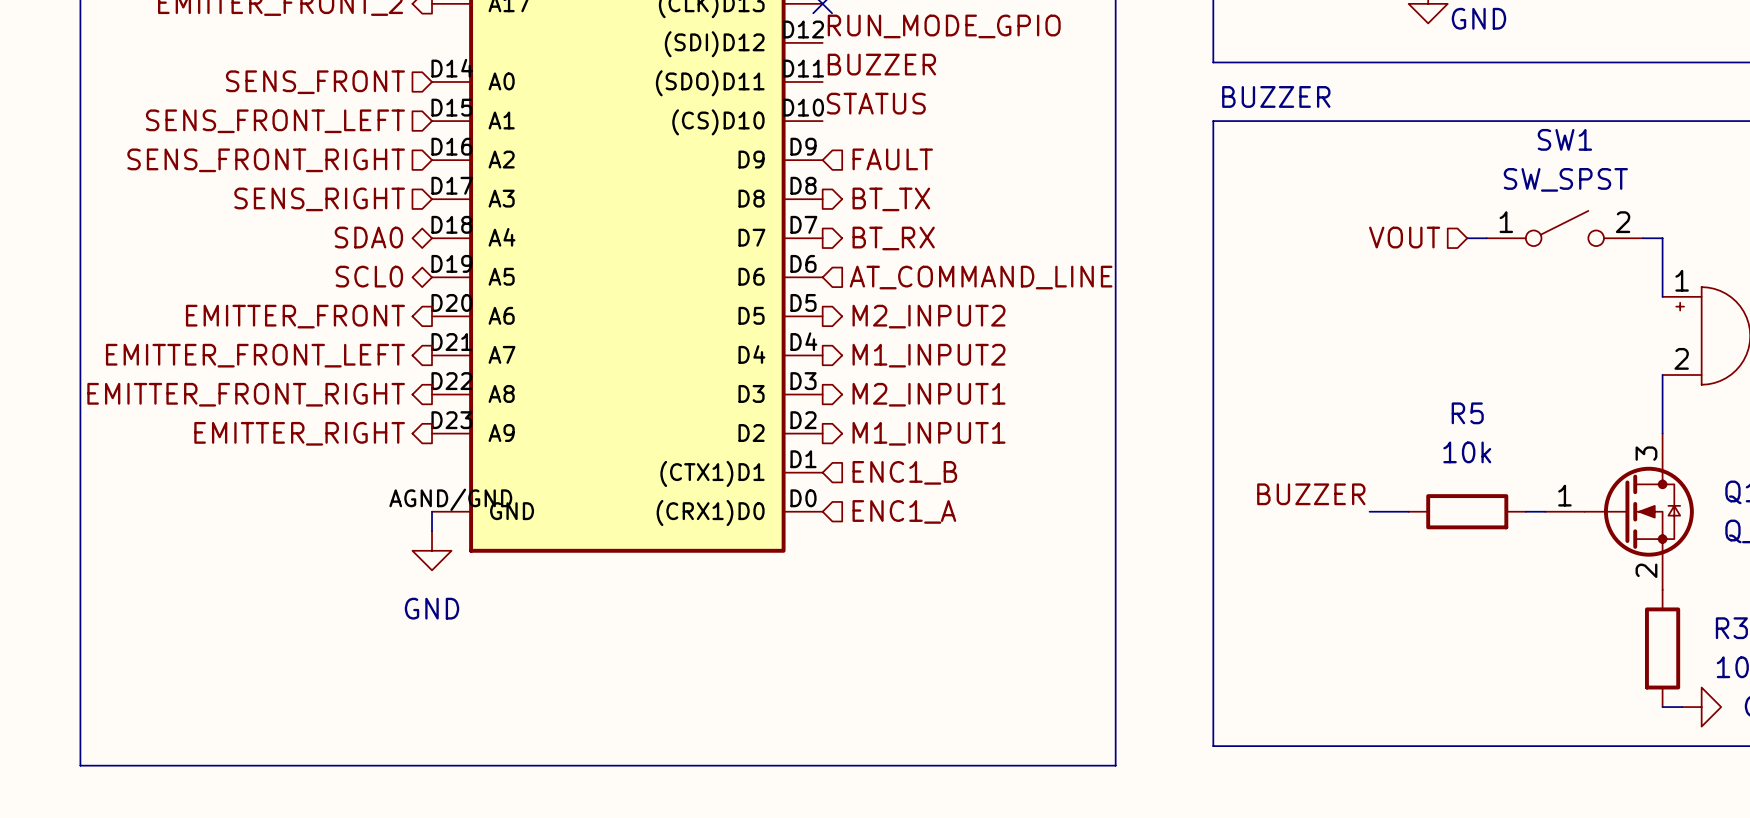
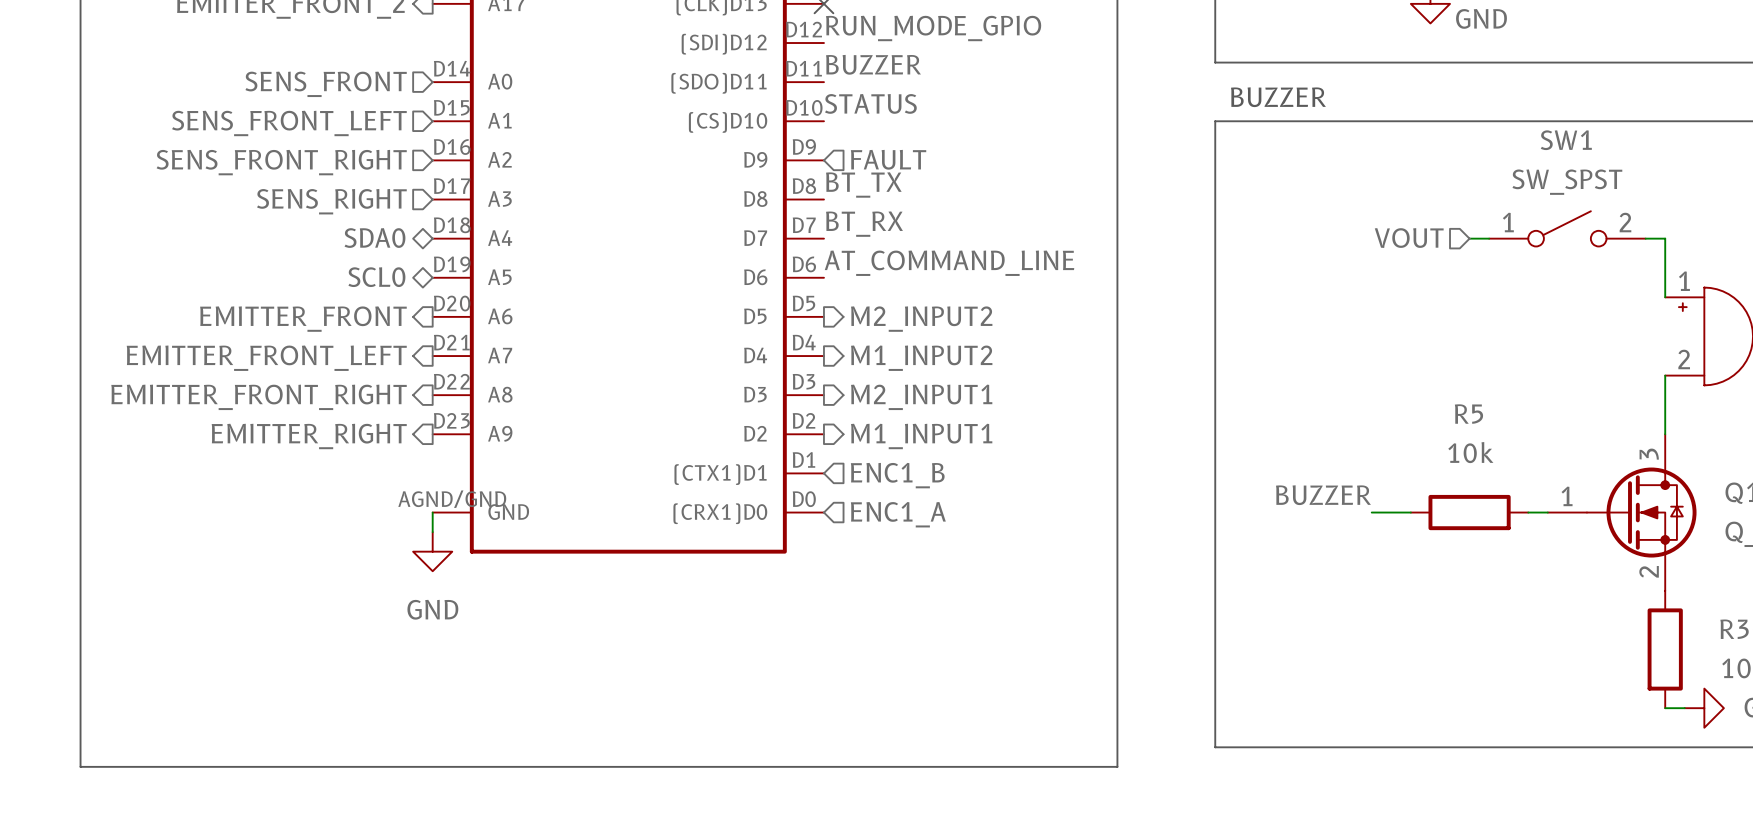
label: none -> BT_TX (863, 184)
hierarchical label: BT_TX (891, 199) -> none
label: none -> BT_RX (864, 224)
hierarchical label: BT_RX (893, 238) -> none
label: none -> AT_COMMAND_LINE (949, 263)
hierarchical label: AT_COMMAND_LINE (981, 277) -> none

